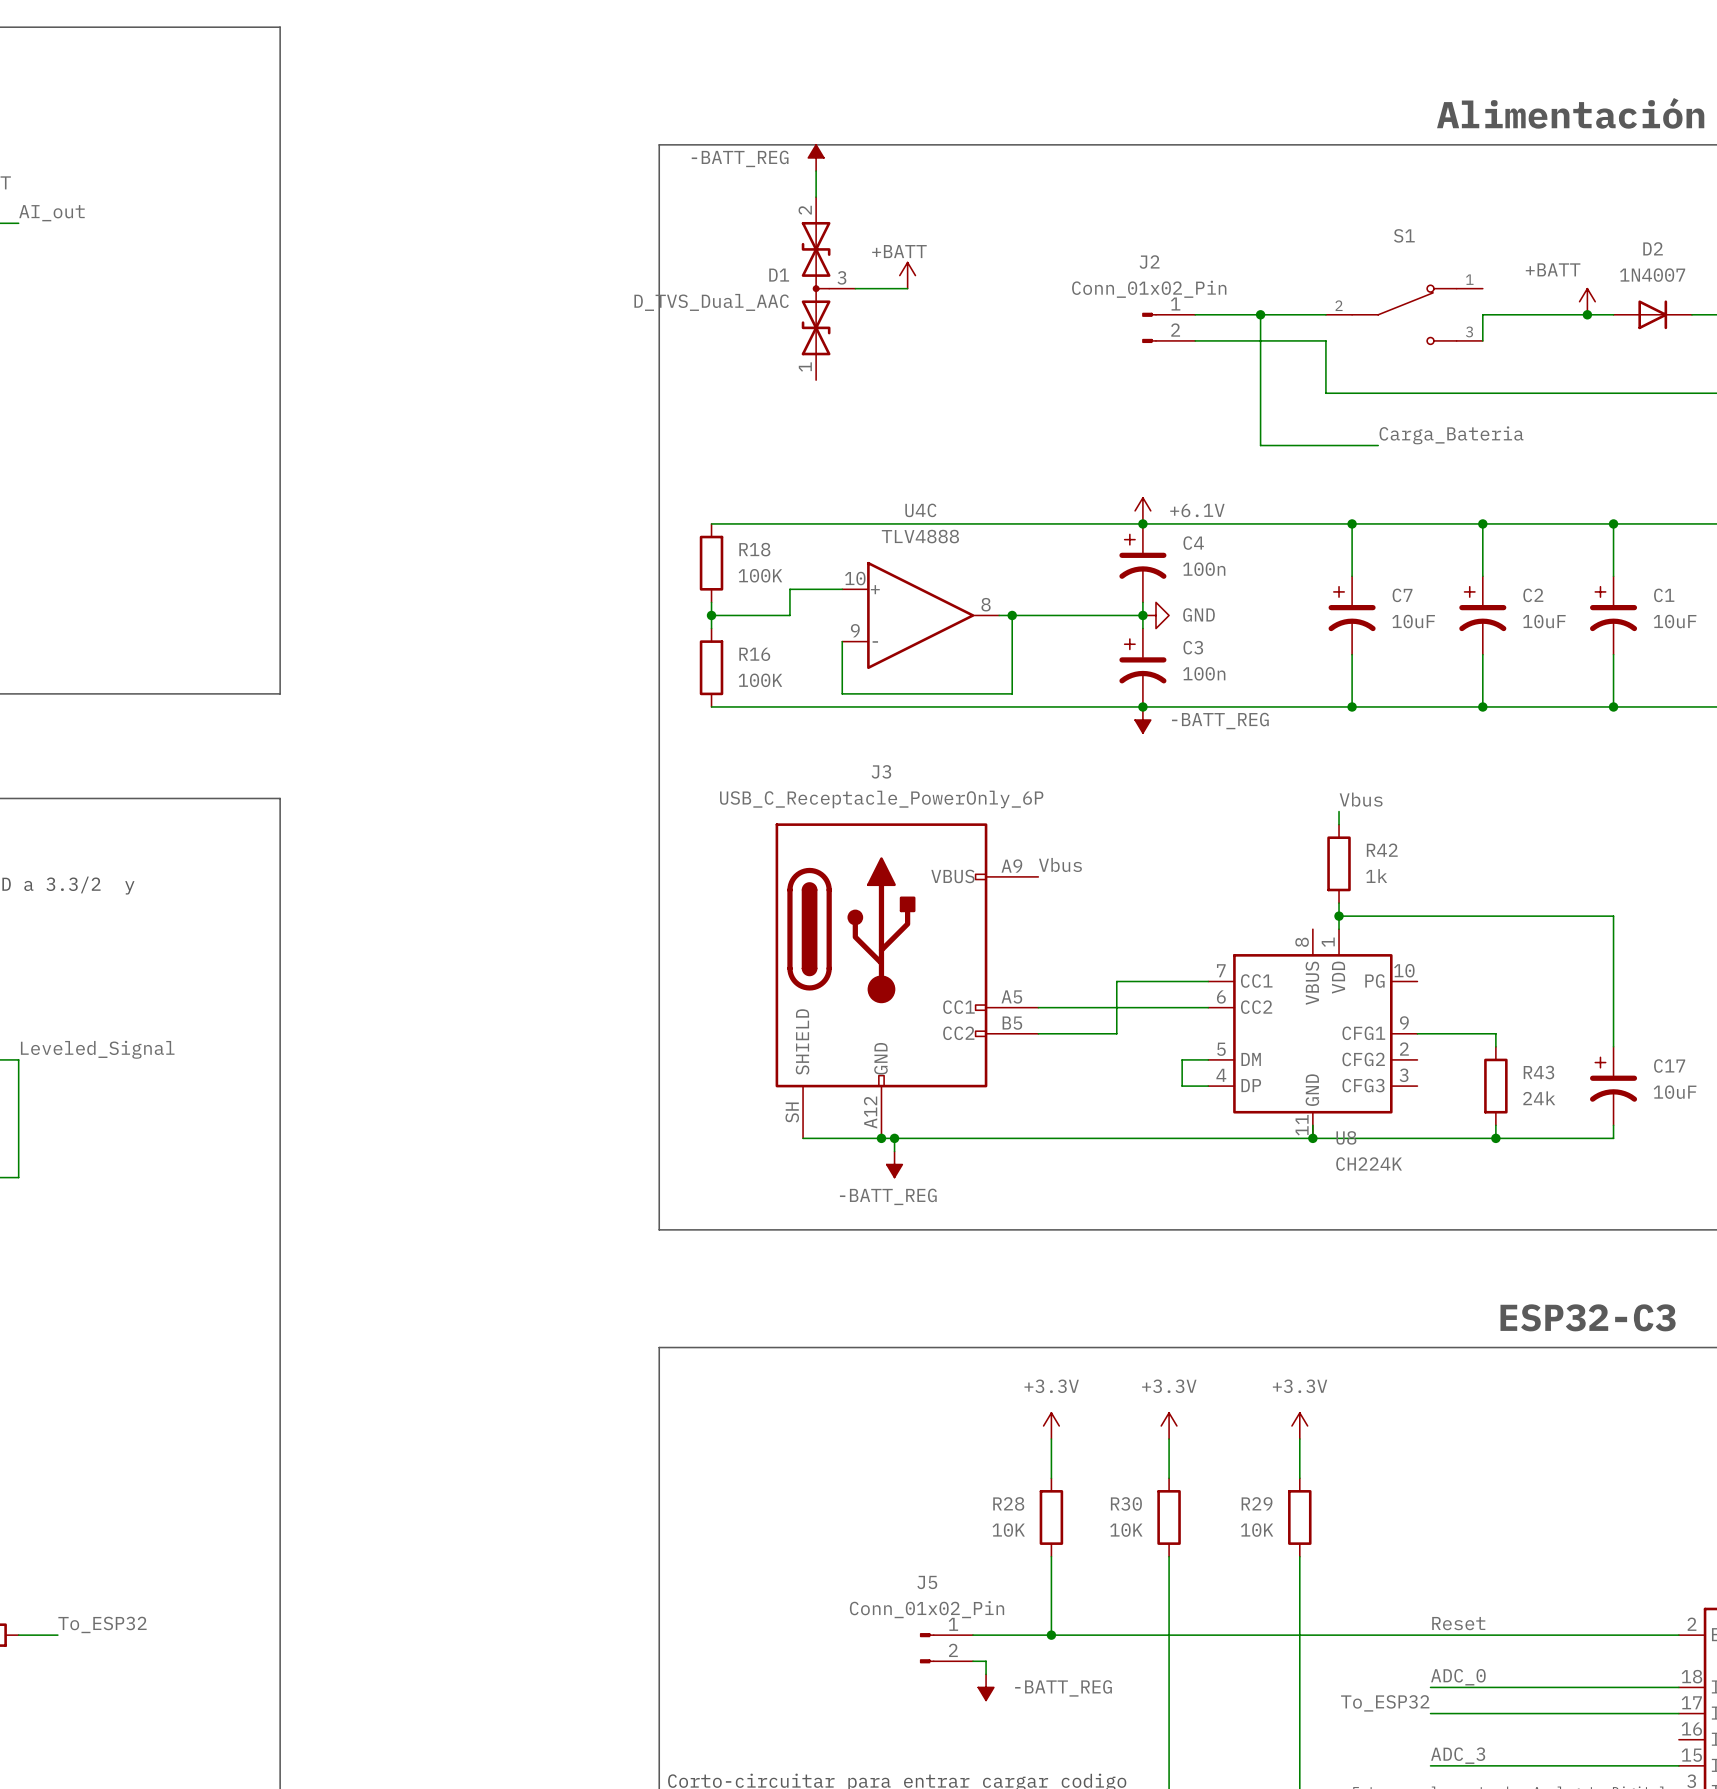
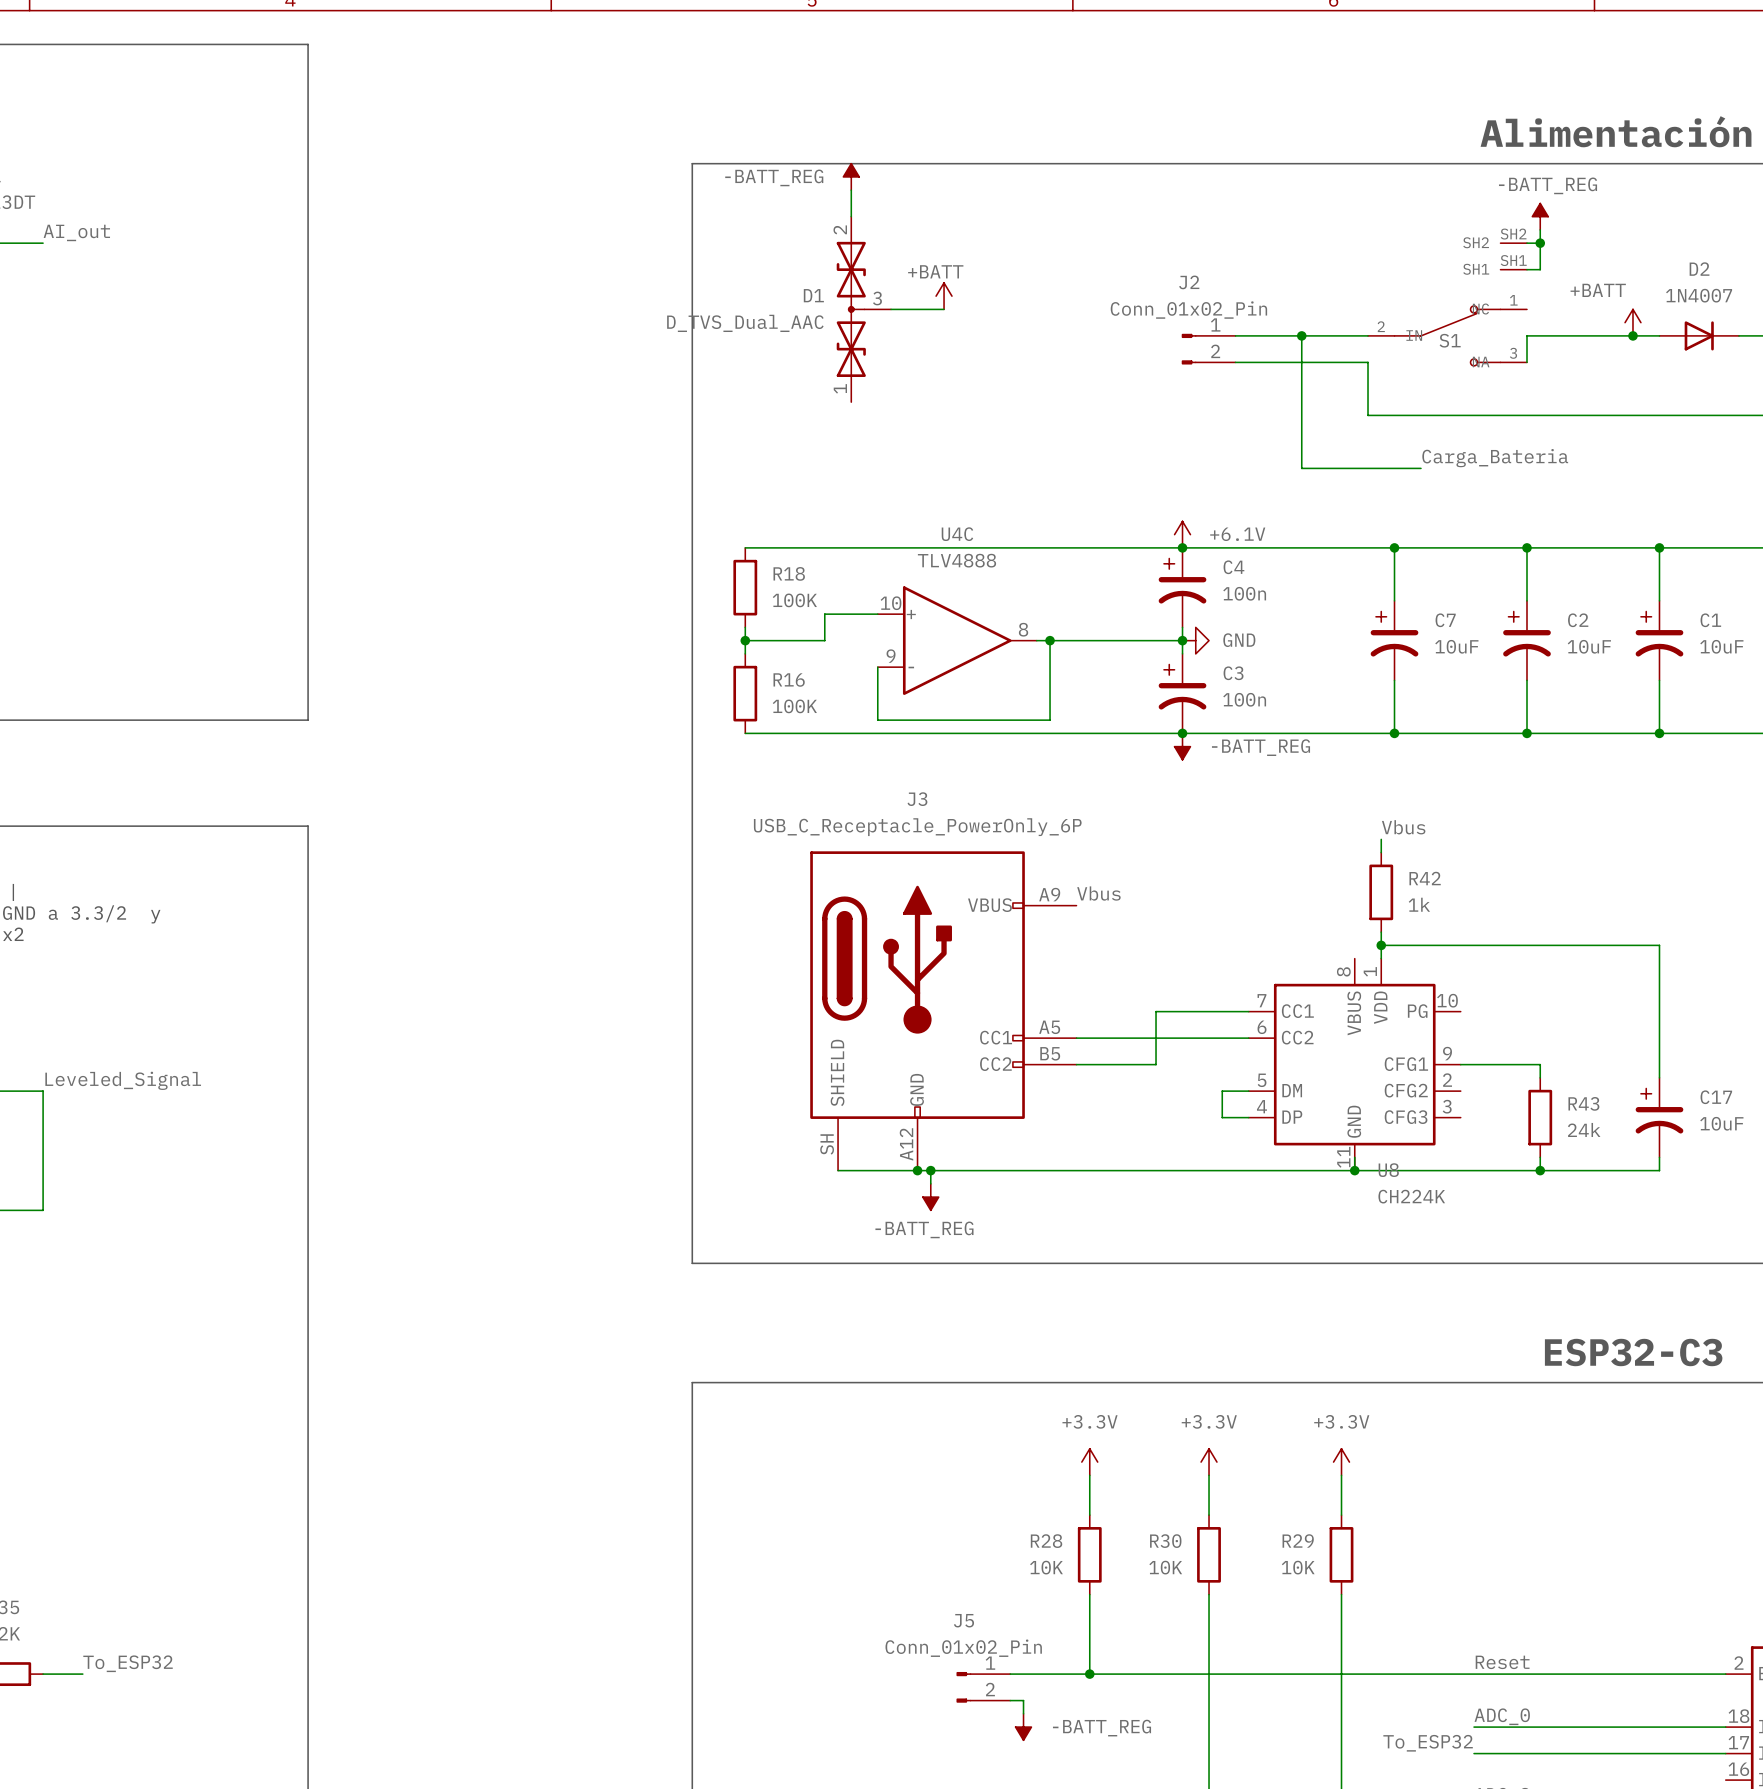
power symbol: none -> -BATT_REG (1540, 216)
wire: none -> (1540, 229) (1540, 269) (1526, 269)
wire: none -> (1526, 243) (1540, 243)
junction: none -> (1540, 243)
S1 name position: S1 (1404, 235) -> S1 (1450, 340)
S1 symbol: [1325, 284, 1483, 346] -> [1368, 243, 1527, 367]

